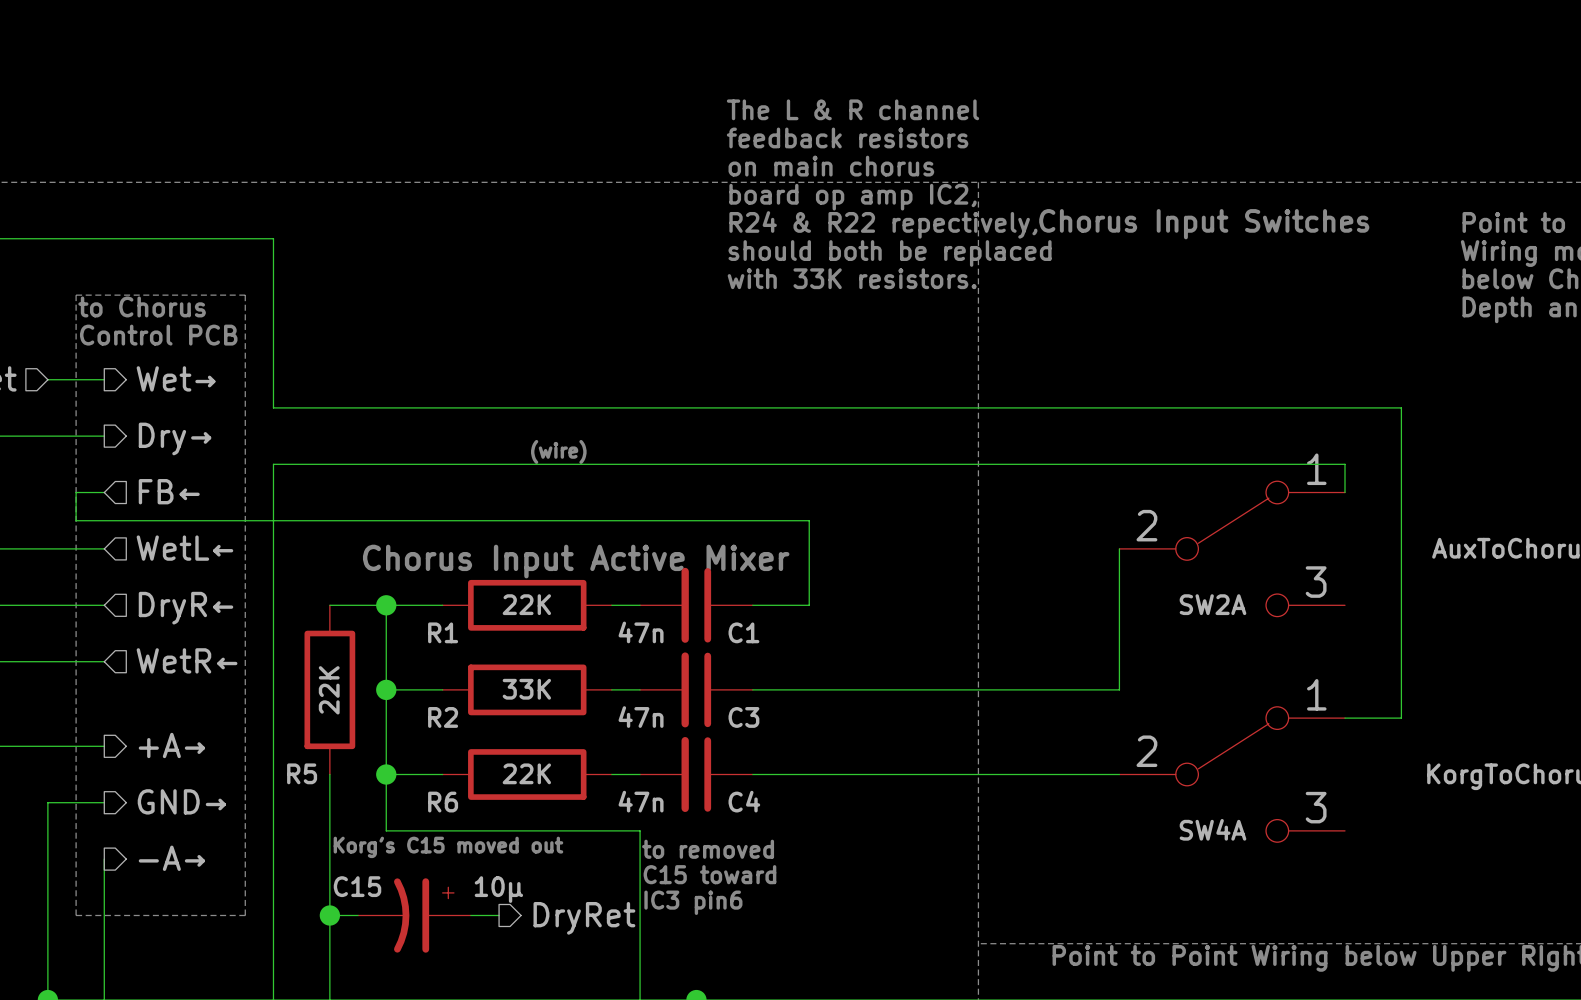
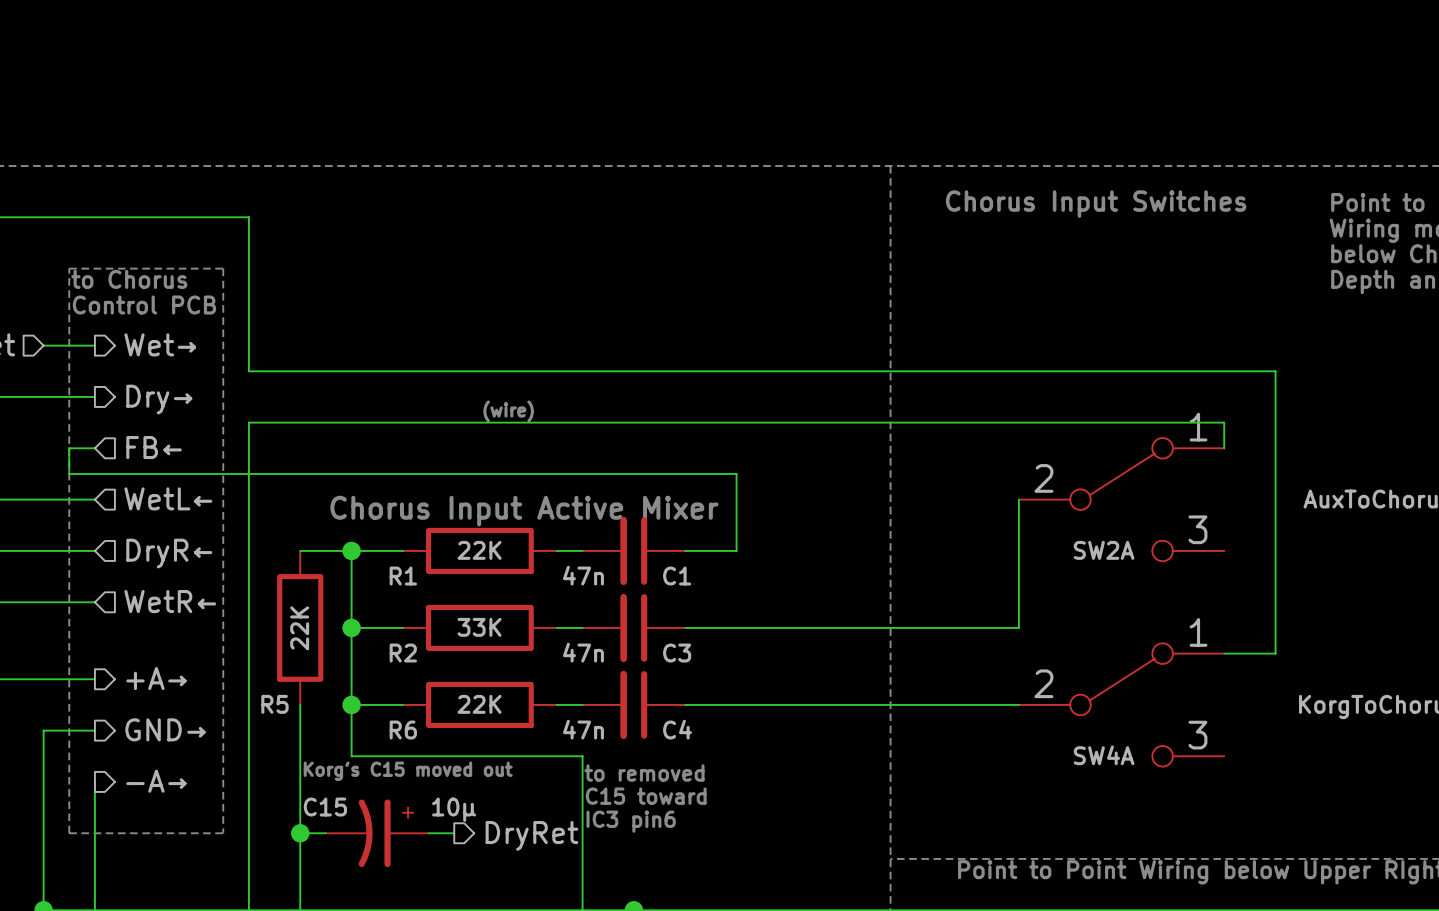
text: The L & R channel (853, 109) -> none
text: feedback resistors (847, 137) -> none
text: on main chorus (831, 166) -> none
text: board op amp IC2, (853, 197) -> none
text: R24 & R22 repectively, (883, 224) -> none
text: should both be replaced (890, 253) -> none
text: with 33K resistors. (852, 278) -> none

